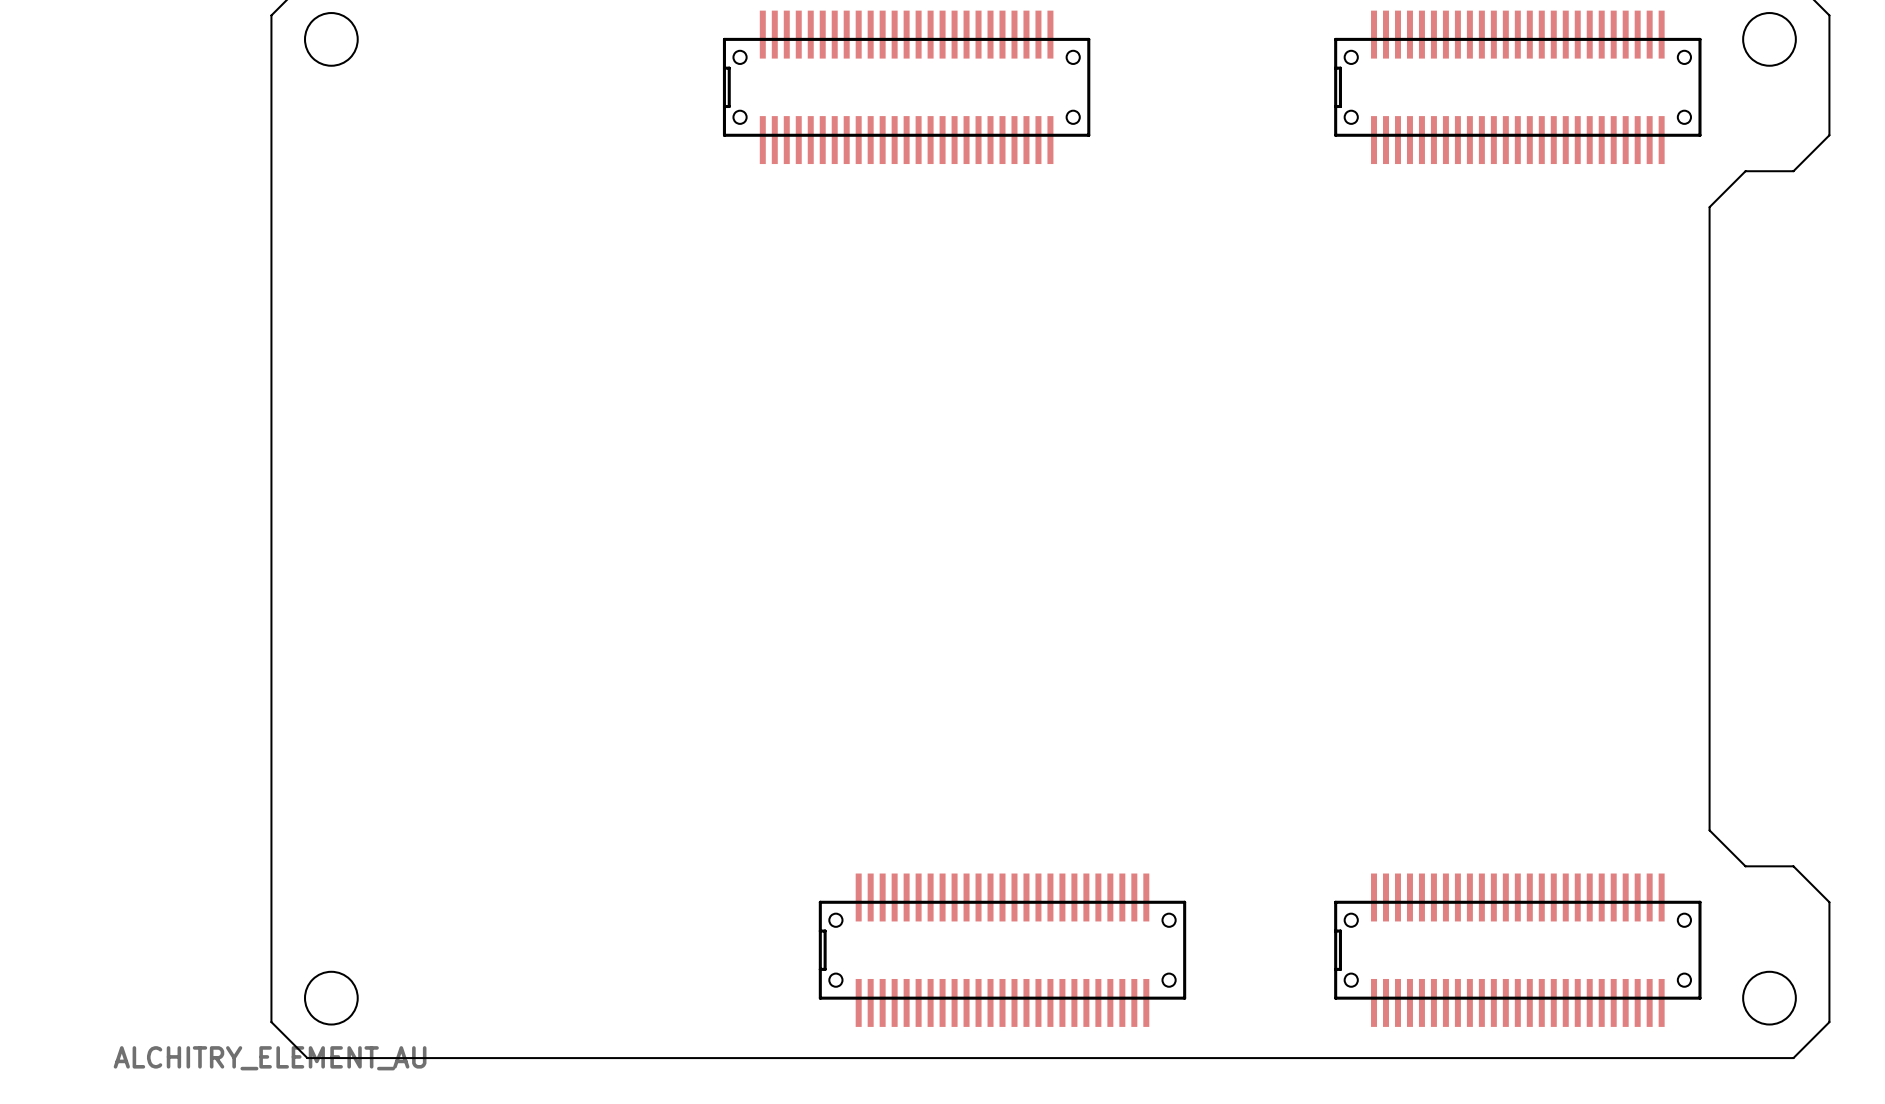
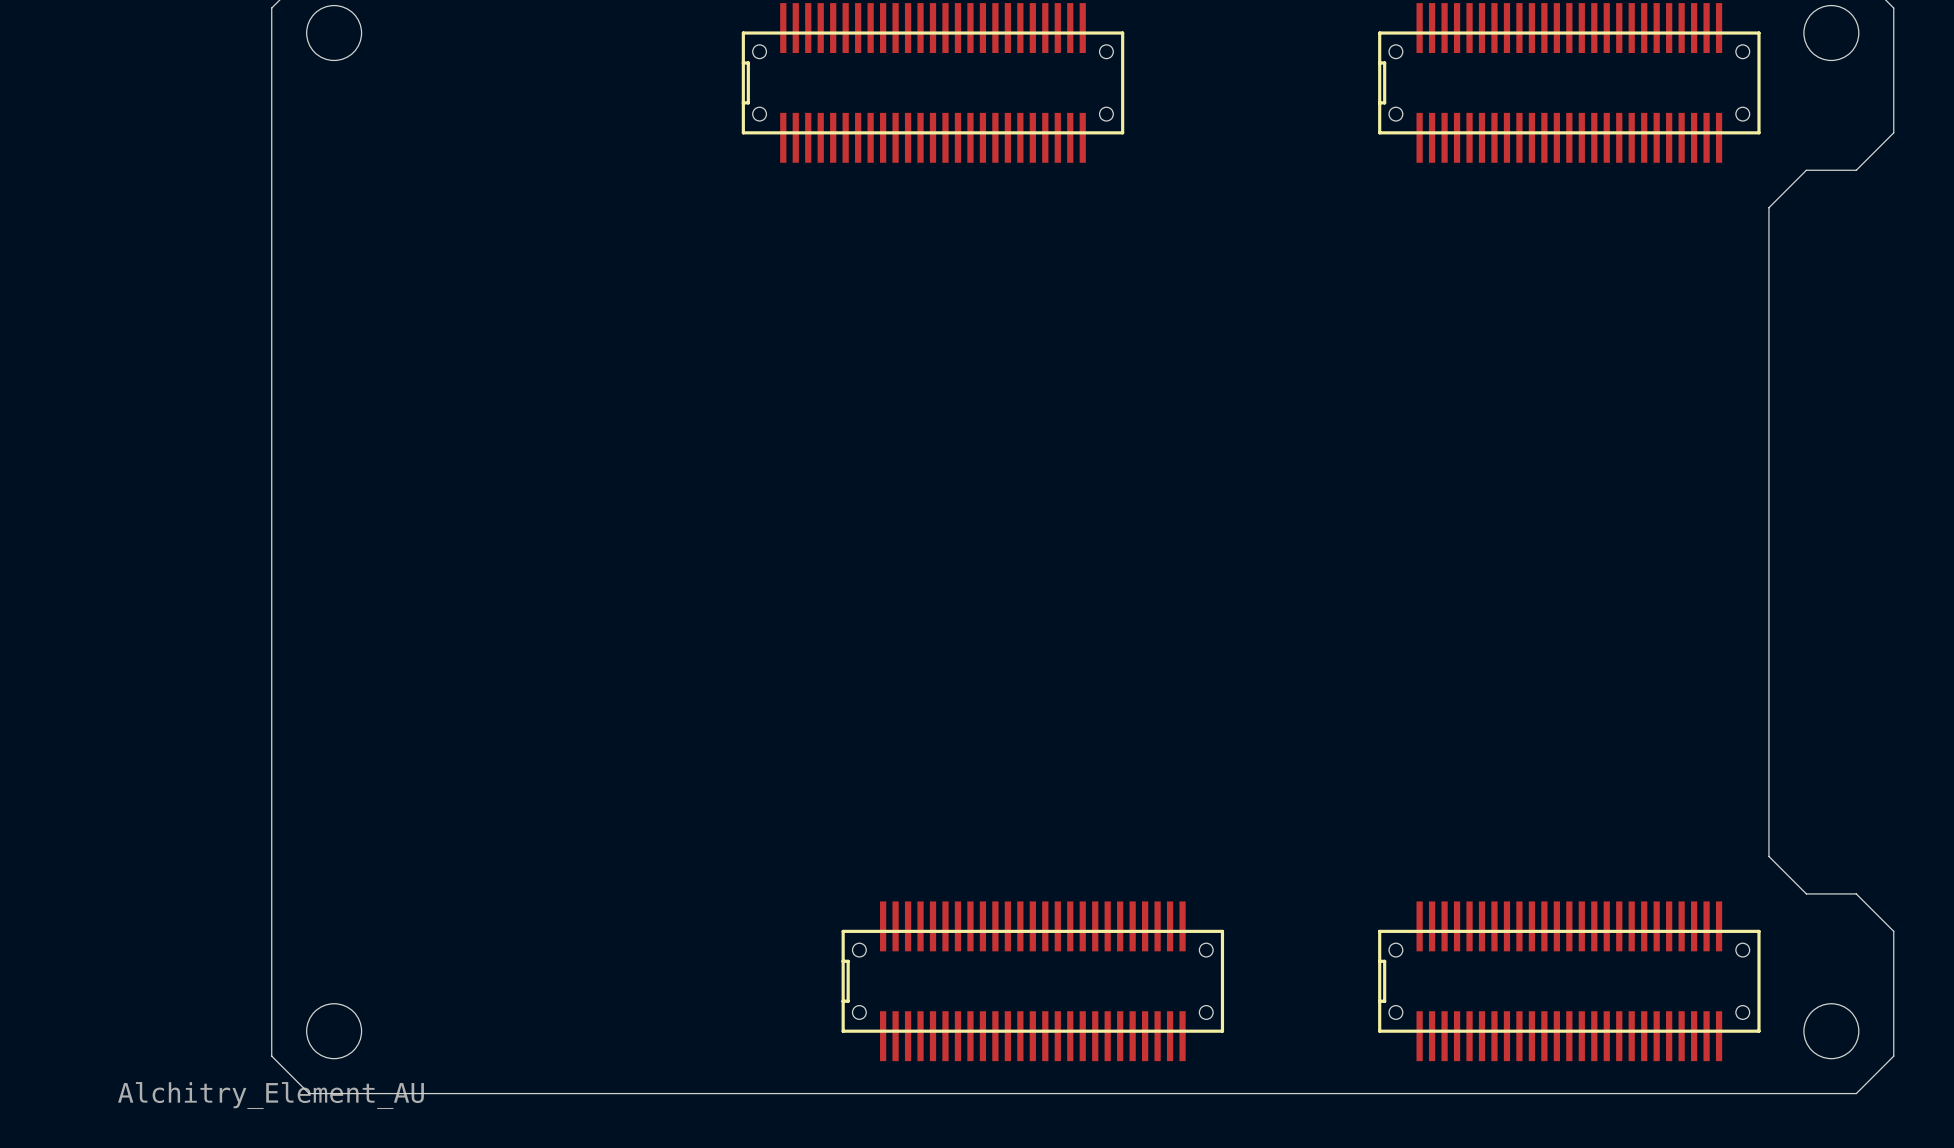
part value: ALCHITRY_ELEMENT_AU (270, 1058) -> Alchitry_Element_AU (270, 1095)

